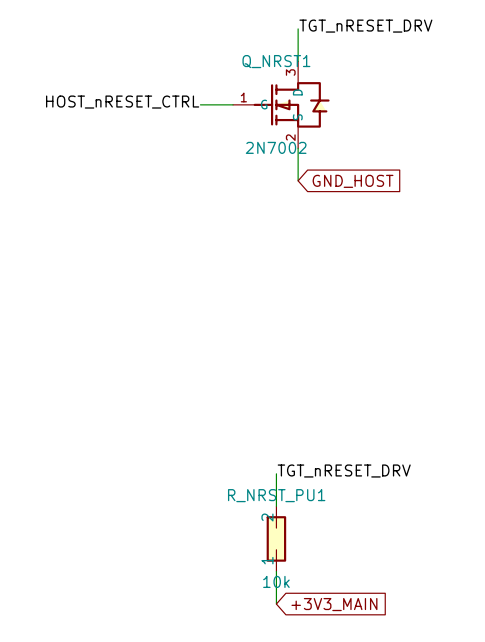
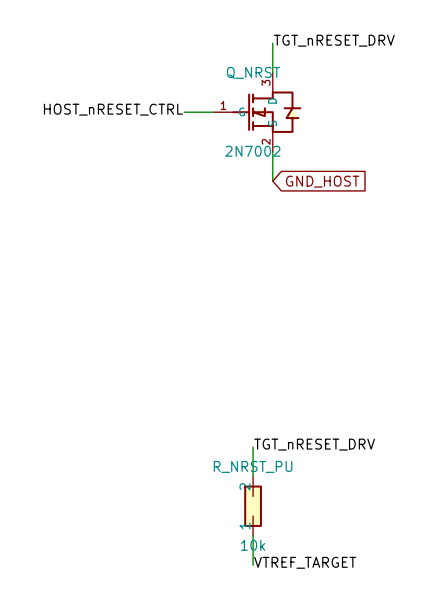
Q_NRST1 name: Q_NRST1 (276, 61) -> Q_NRST (253, 72)
R_NRST_PU1 name: R_NRST_PU1 (276, 495) -> R_NRST_PU (253, 466)
label: none -> VTREF_TARGET (305, 562)
global label: +3V3_MAIN (334, 604) -> none

